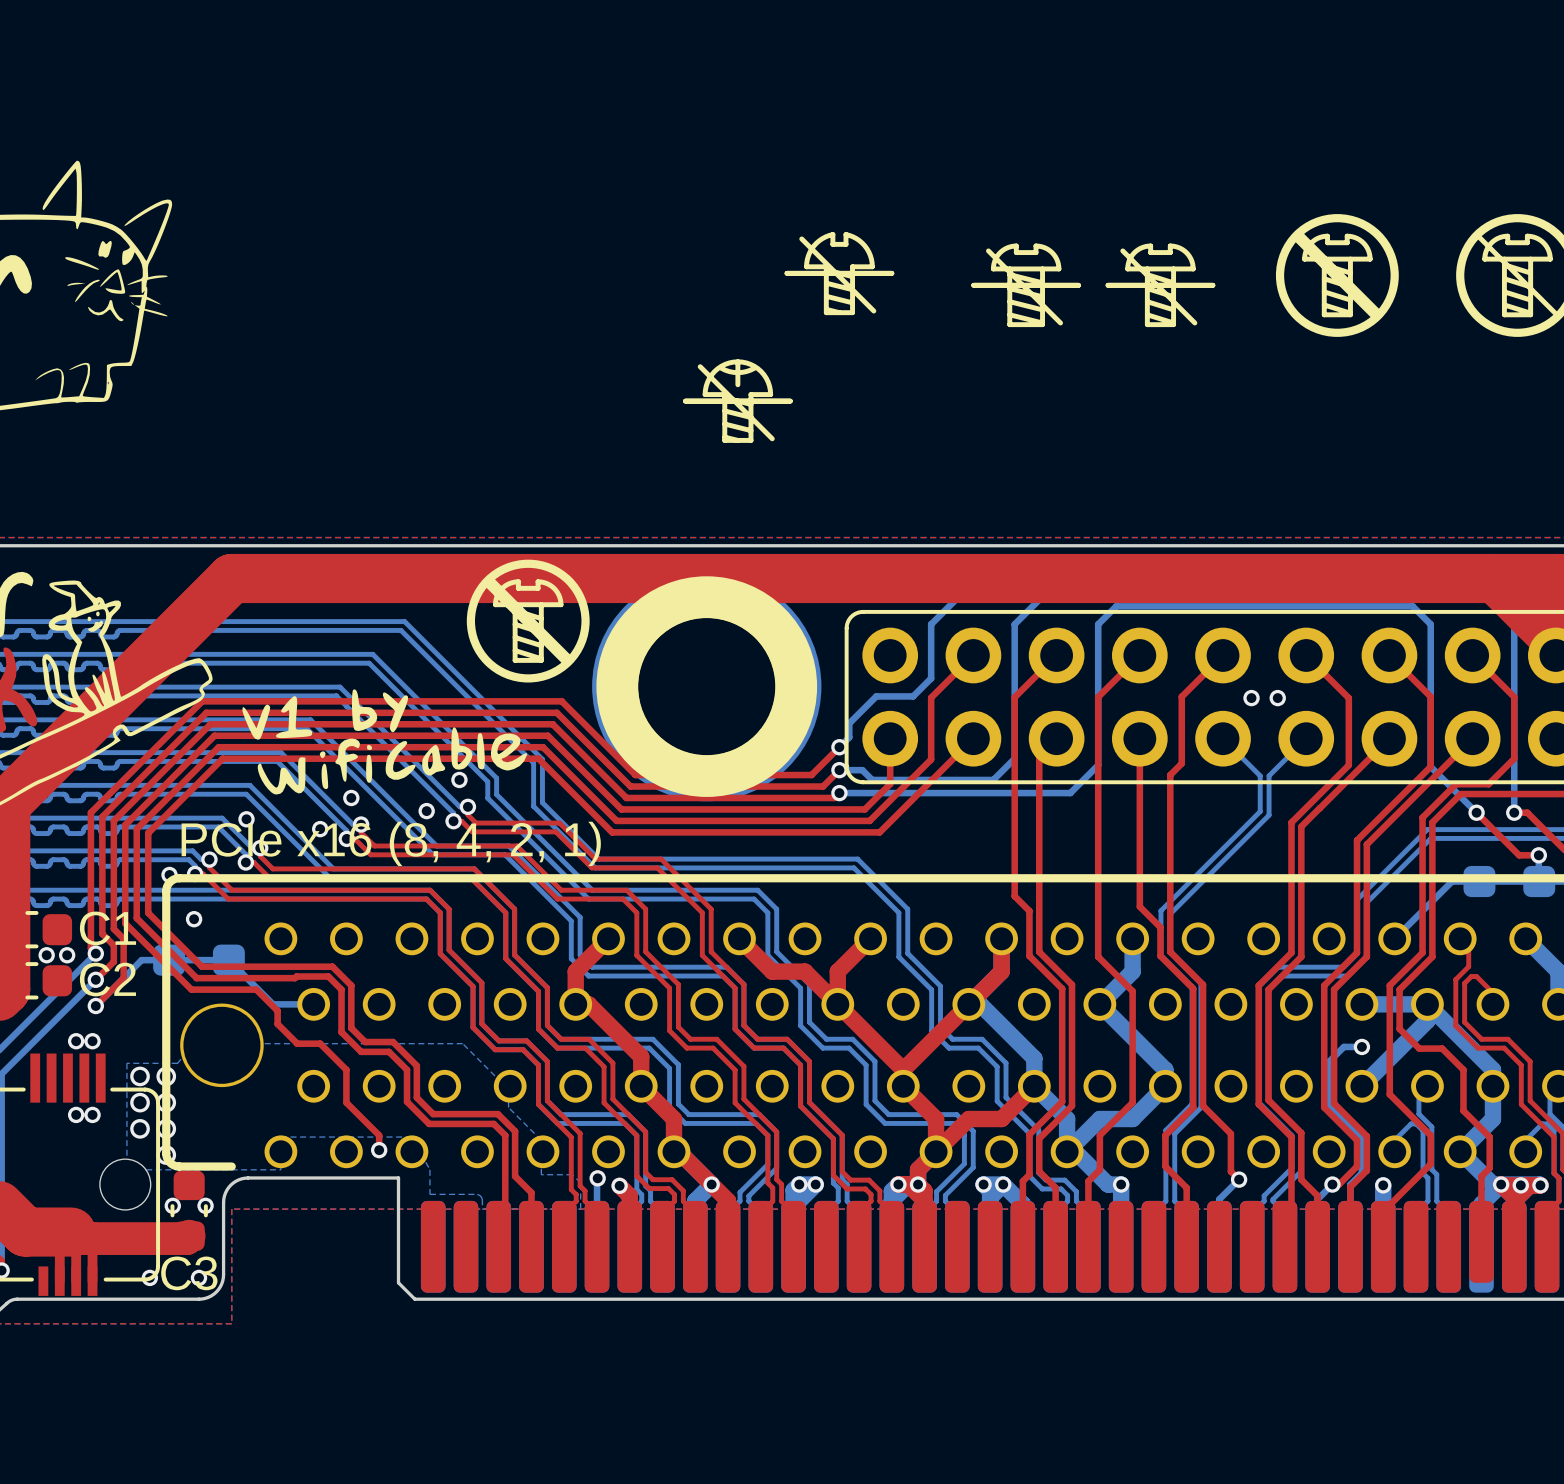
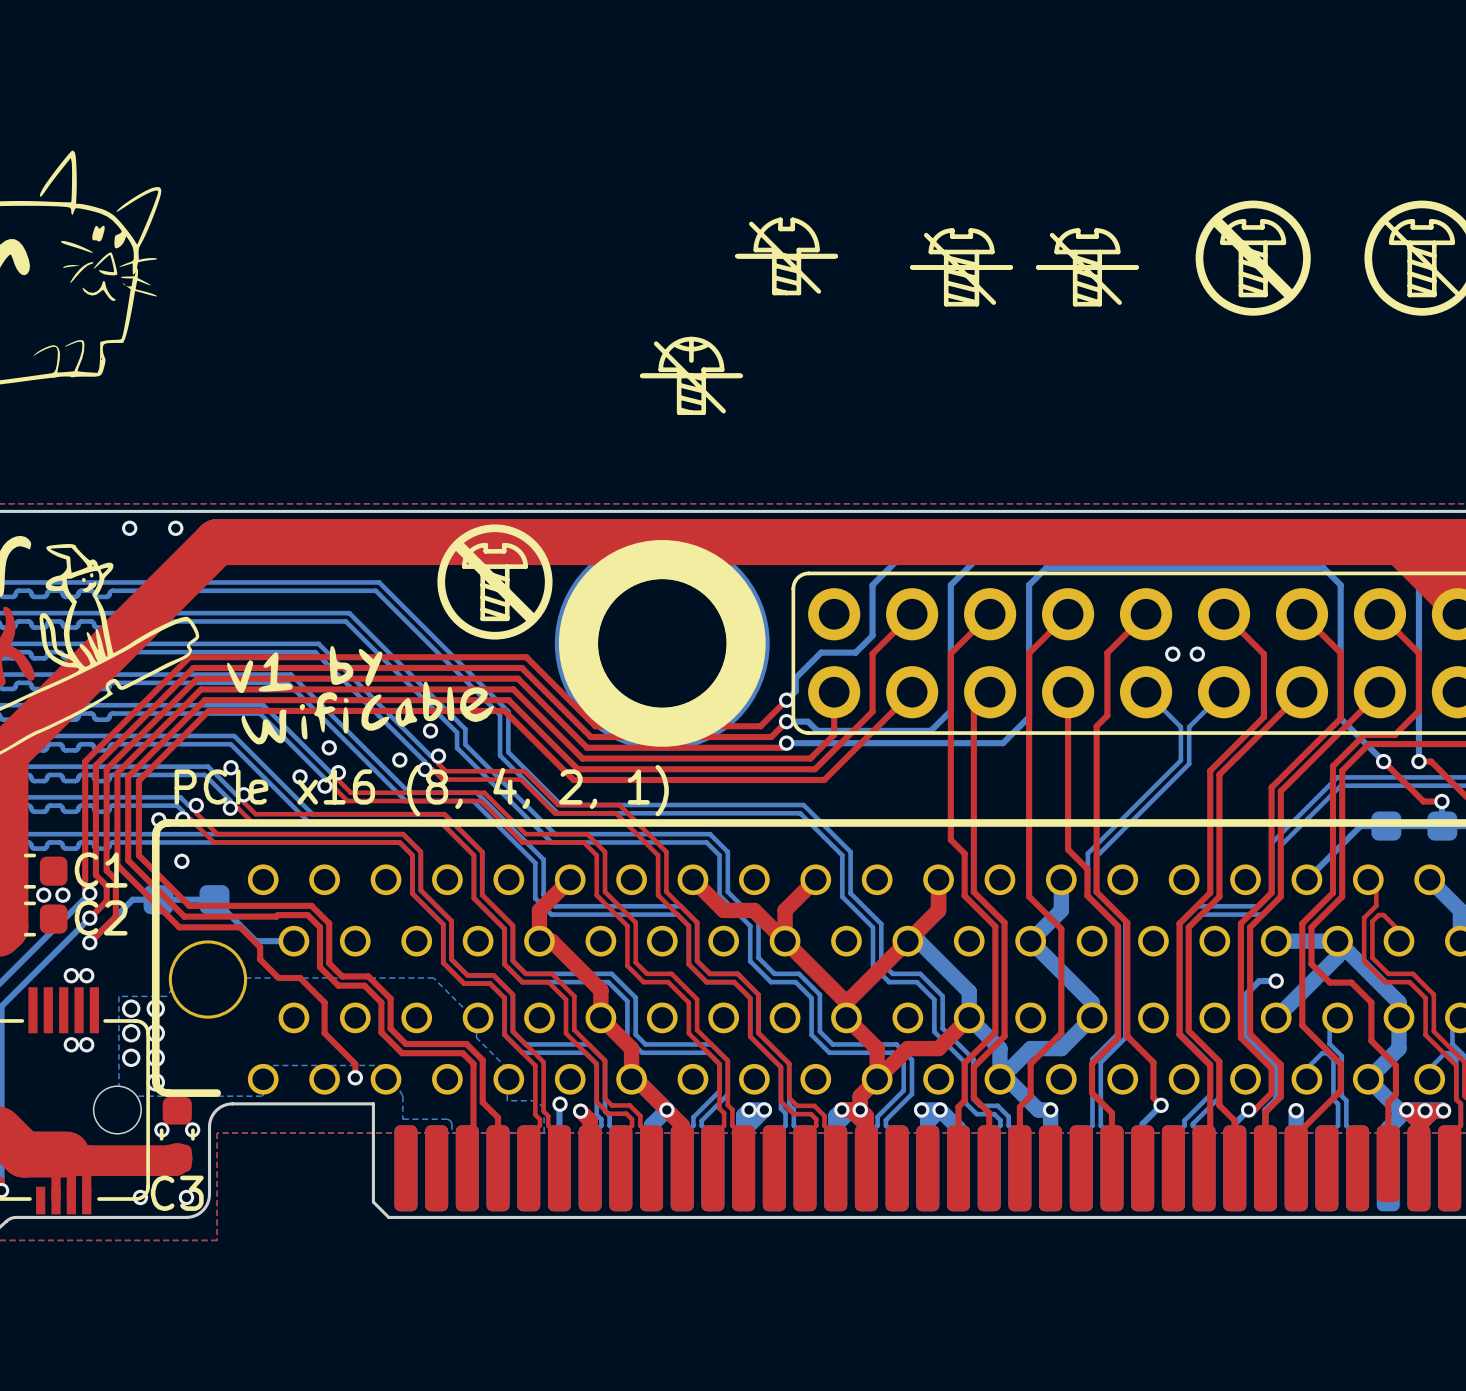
via: none -> (129, 528)
via: none -> (175, 528)

